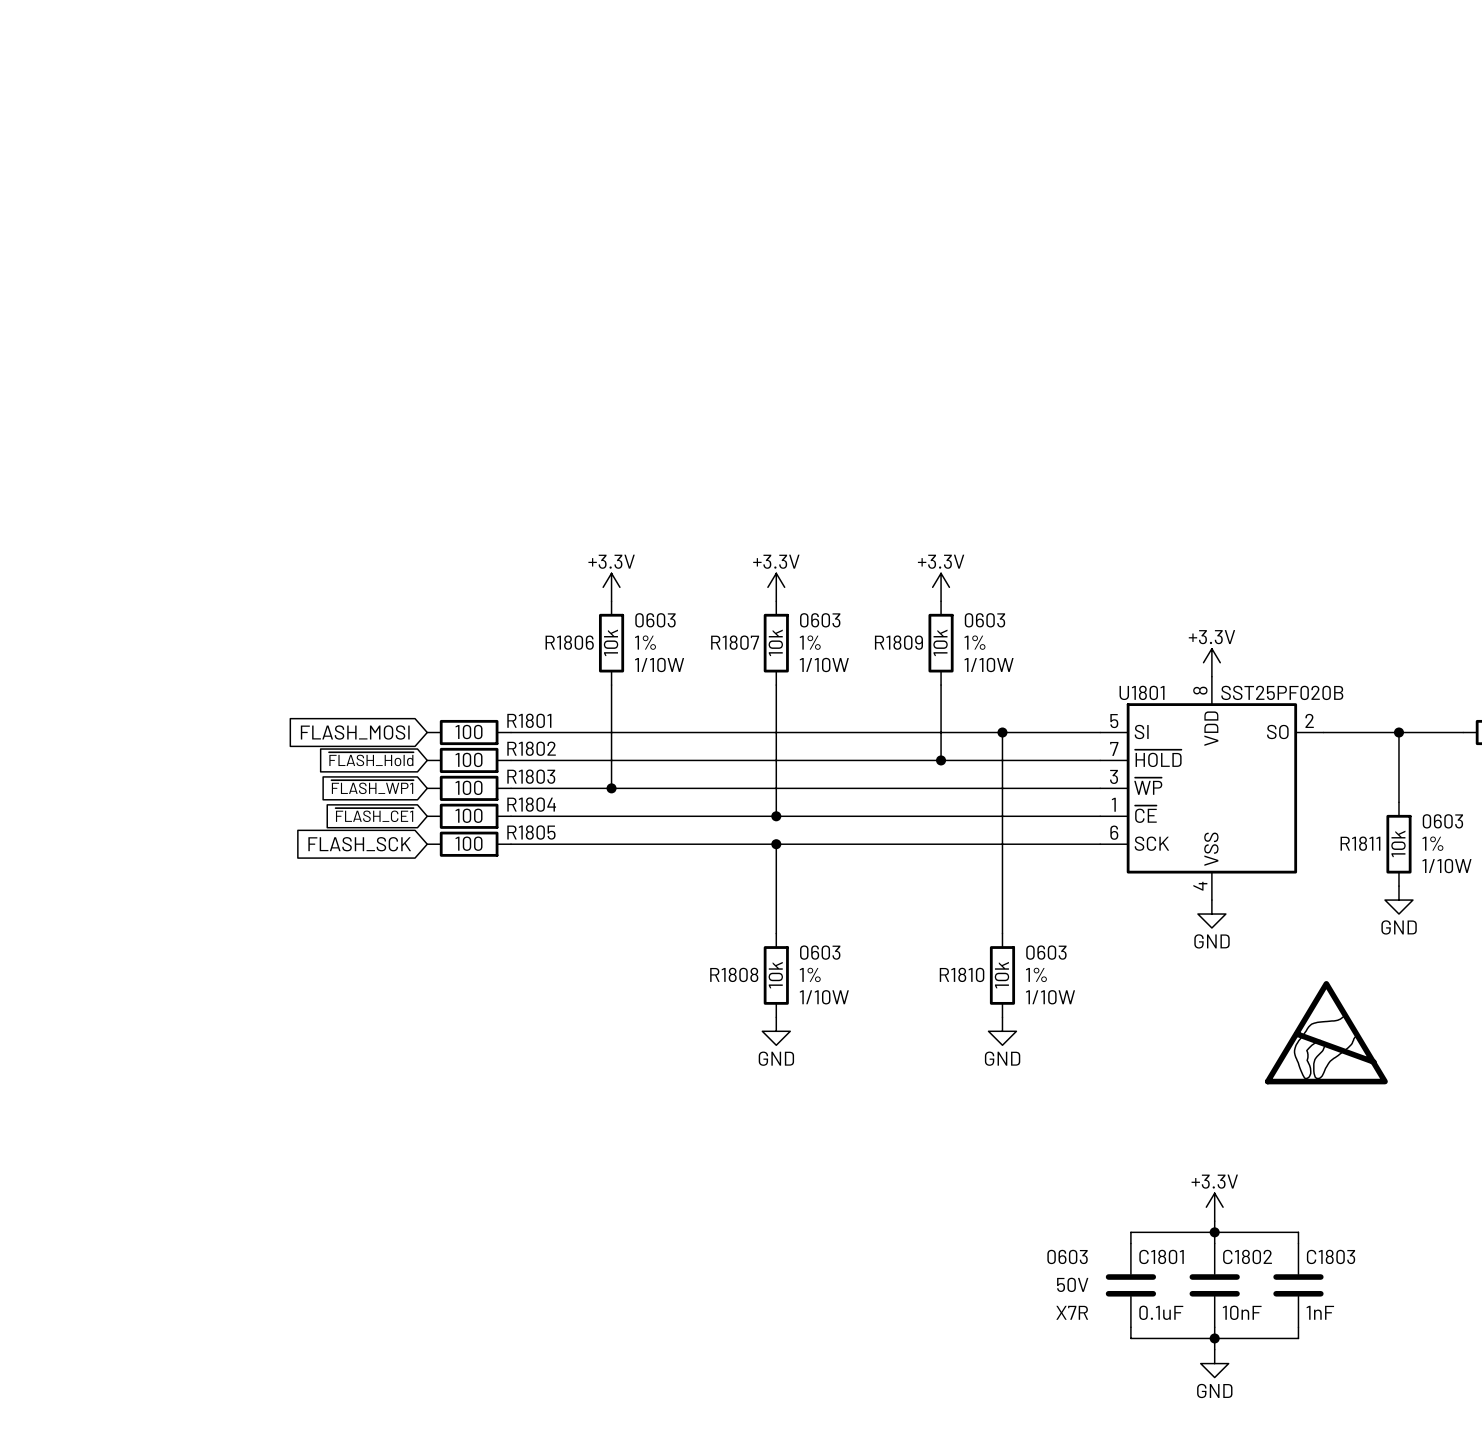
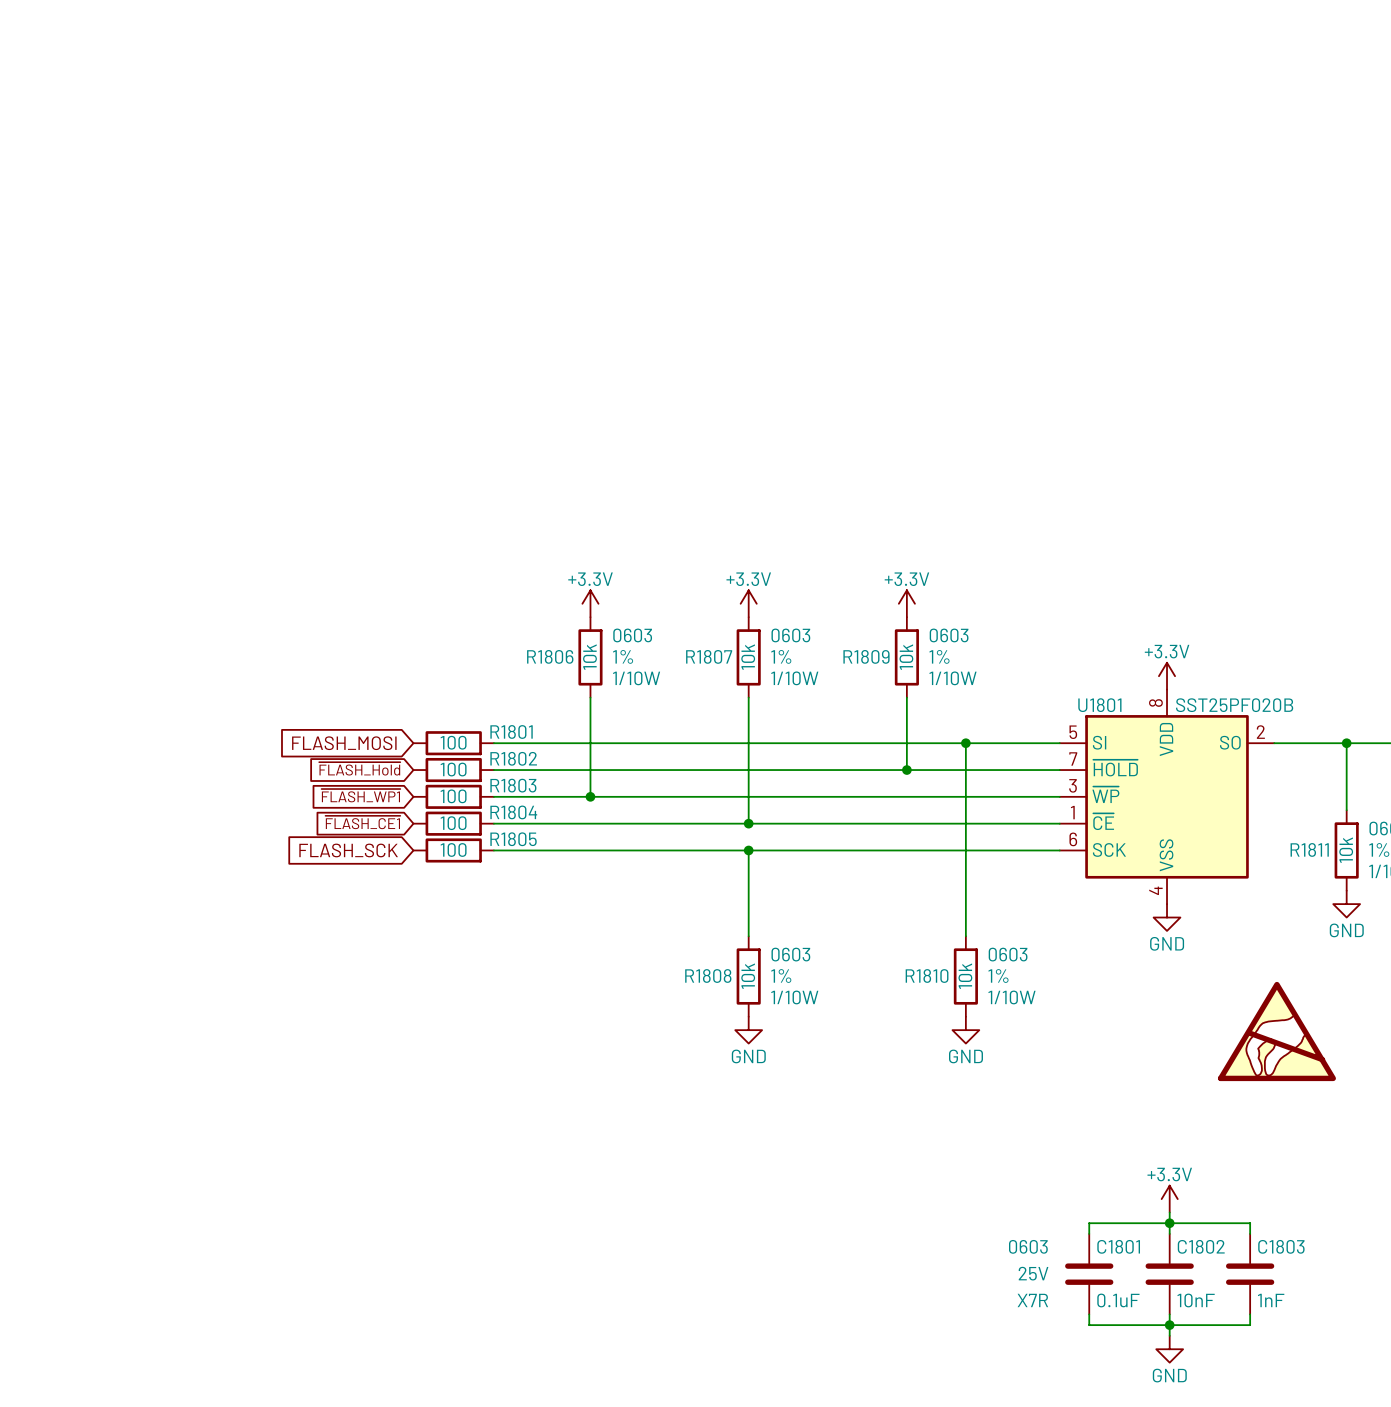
C1801 text: 50V (1072, 1284) -> 25V (1033, 1273)

